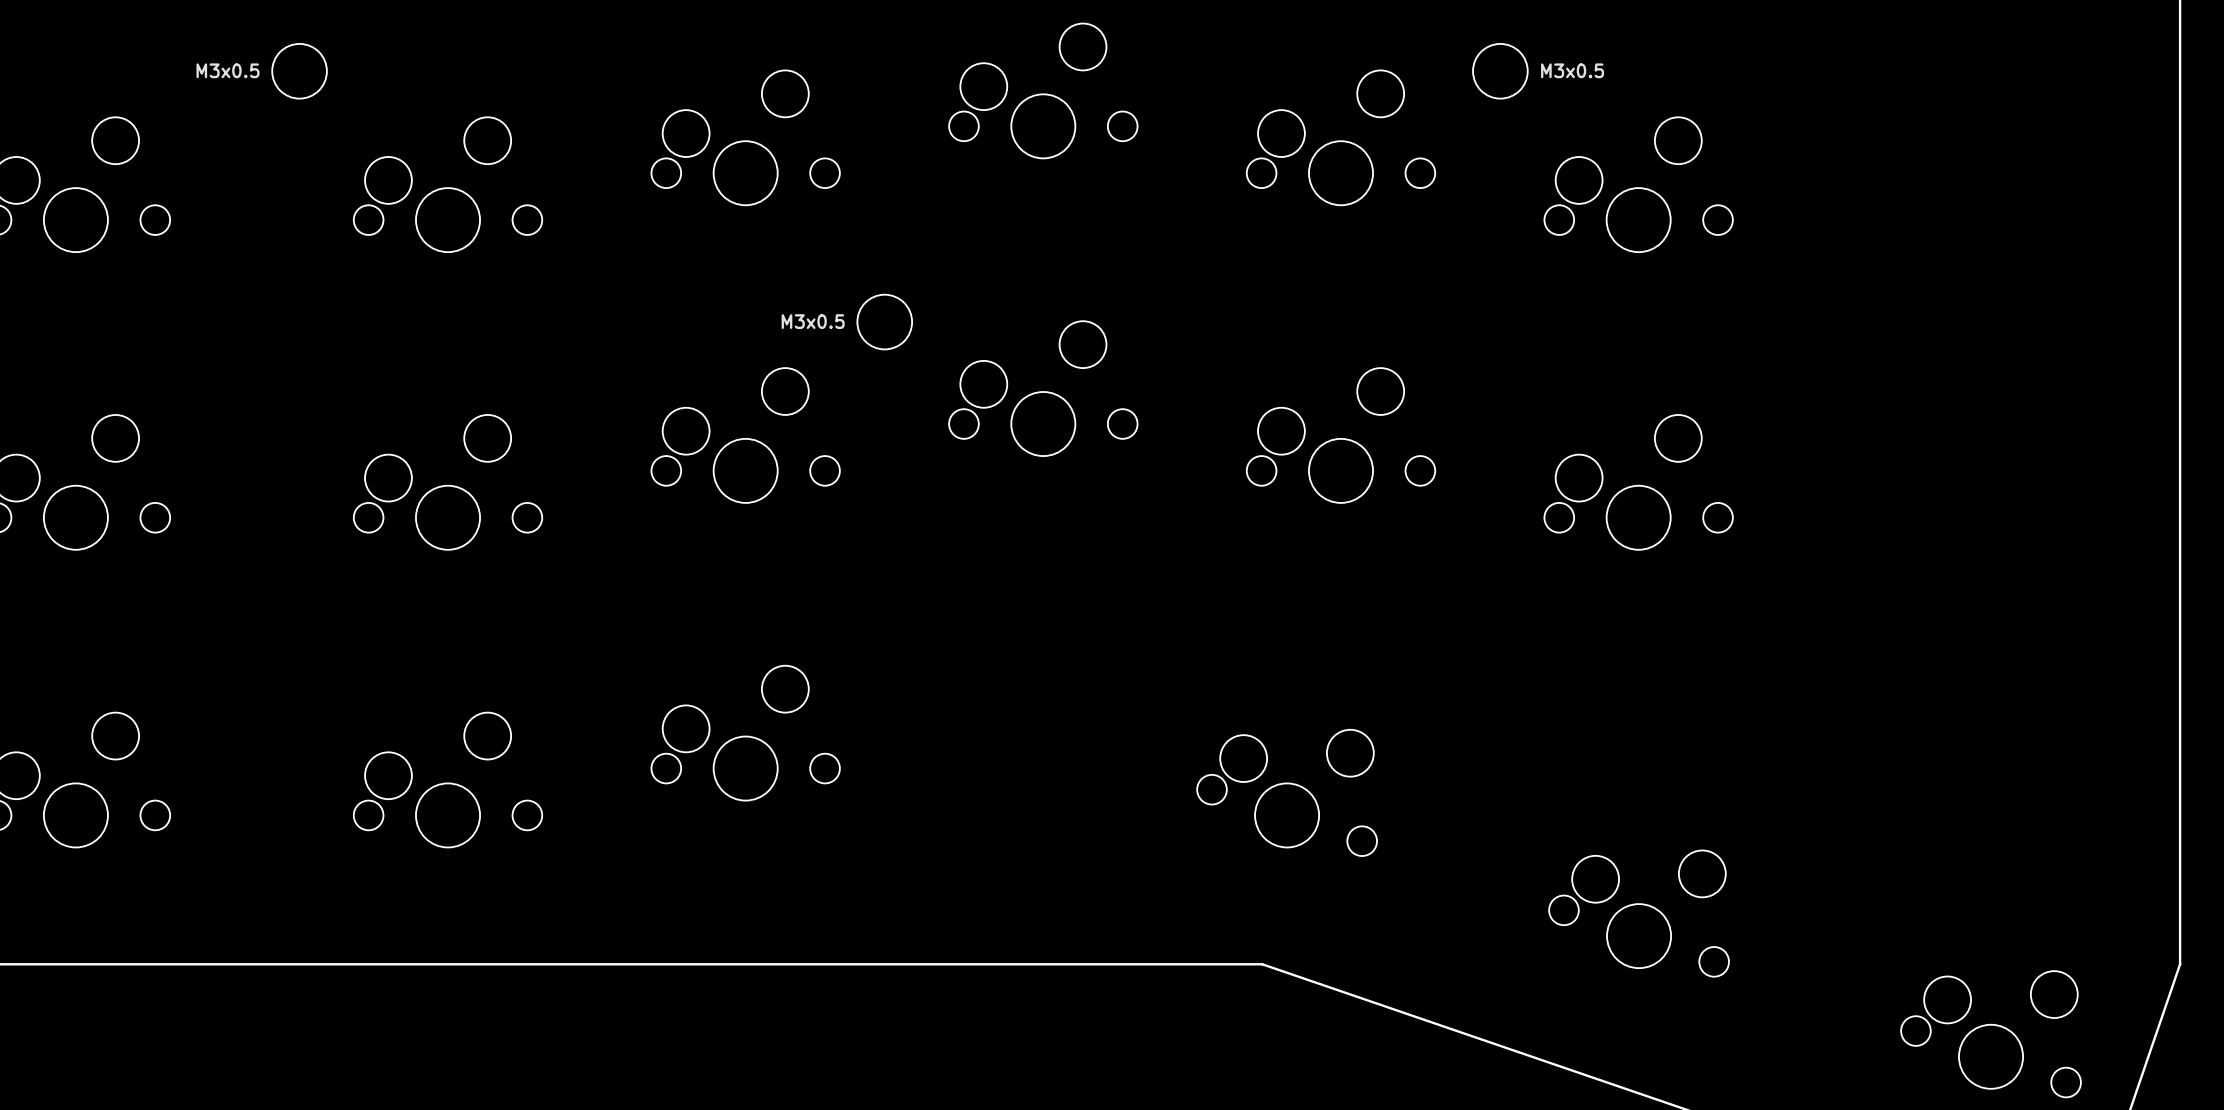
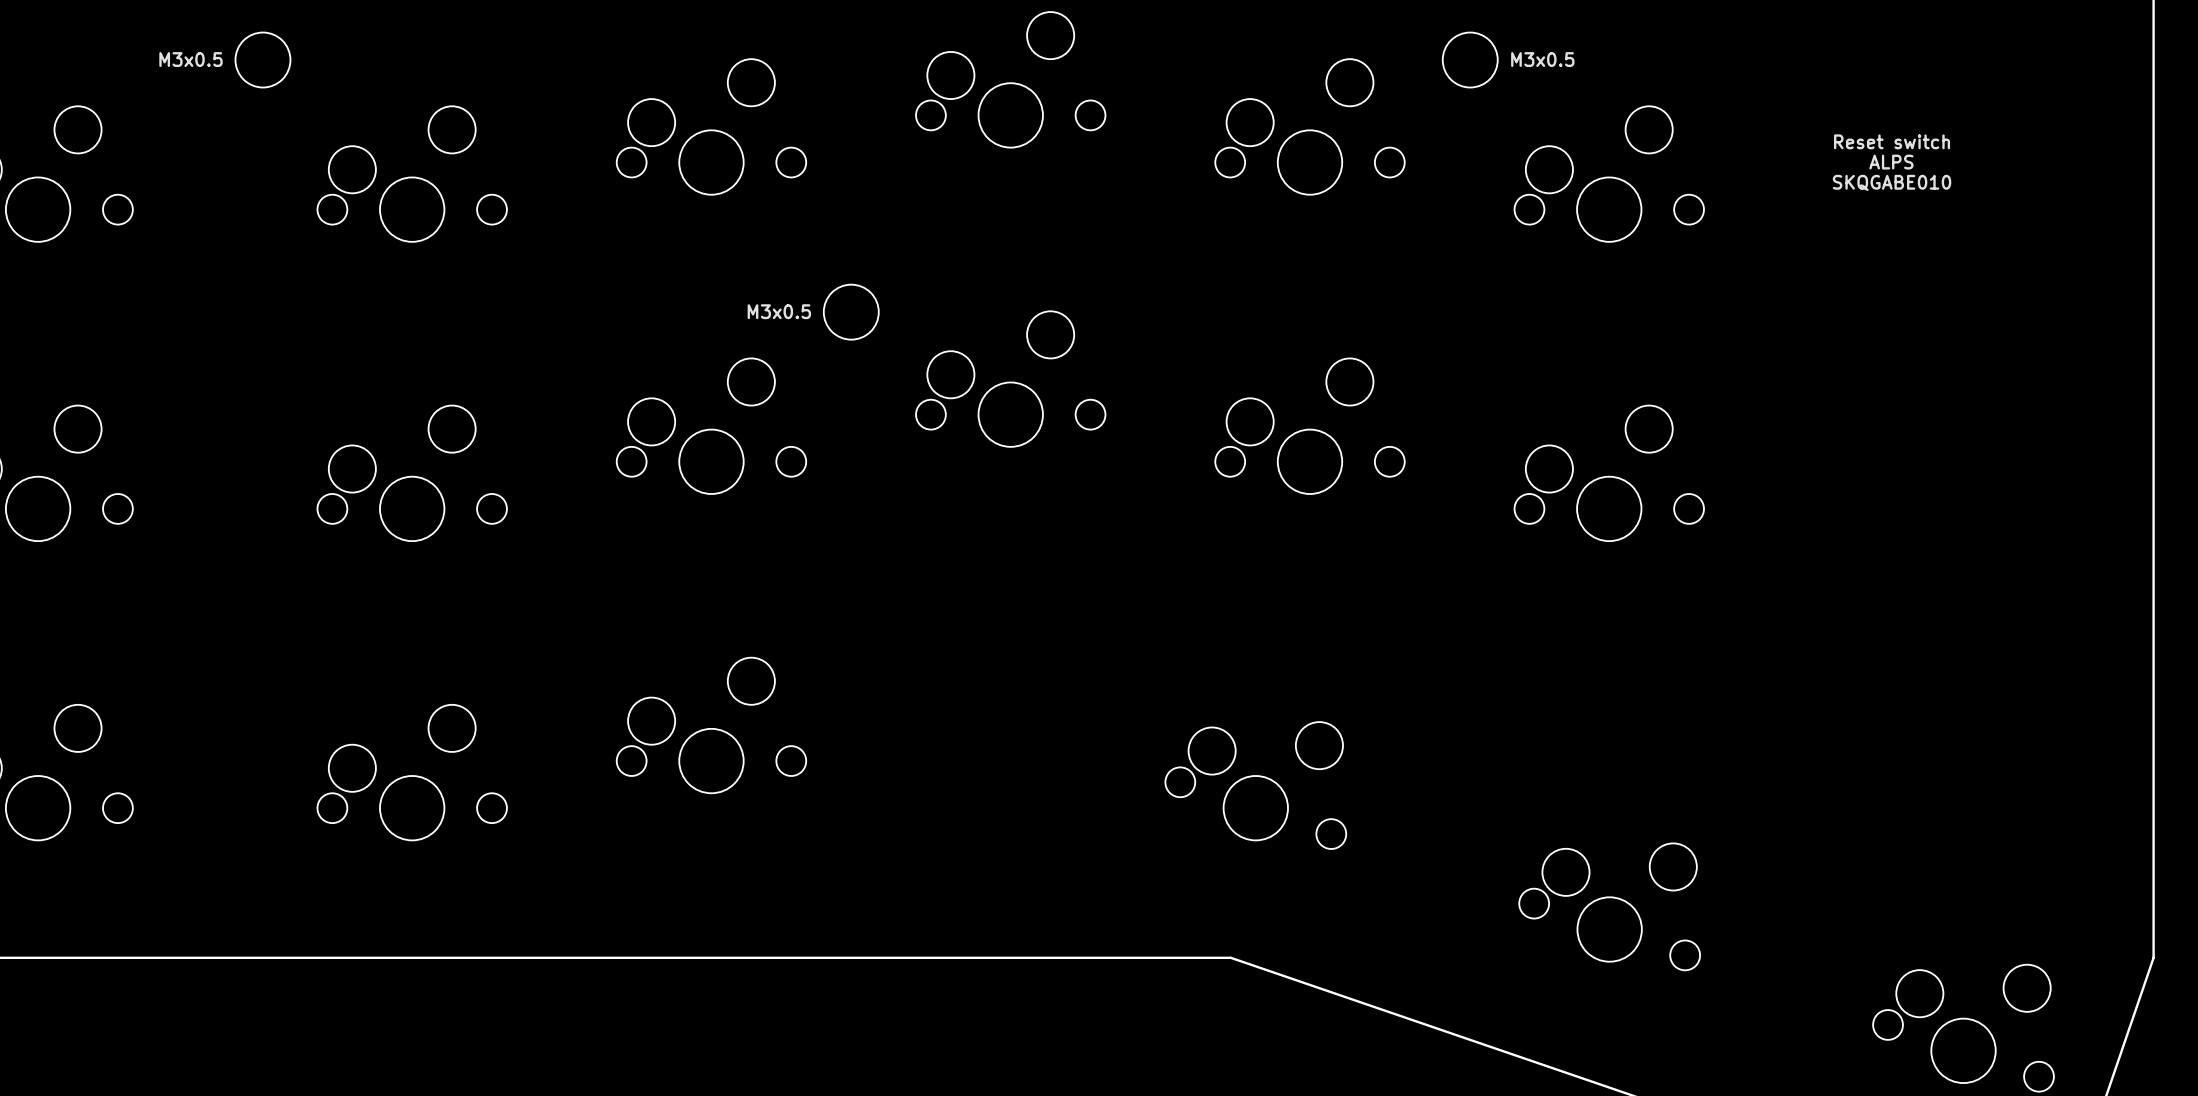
text: none -> Reset switch (1892, 141)
text: none -> ALPS (1891, 162)
text: none -> SKQGABE010 (1892, 182)

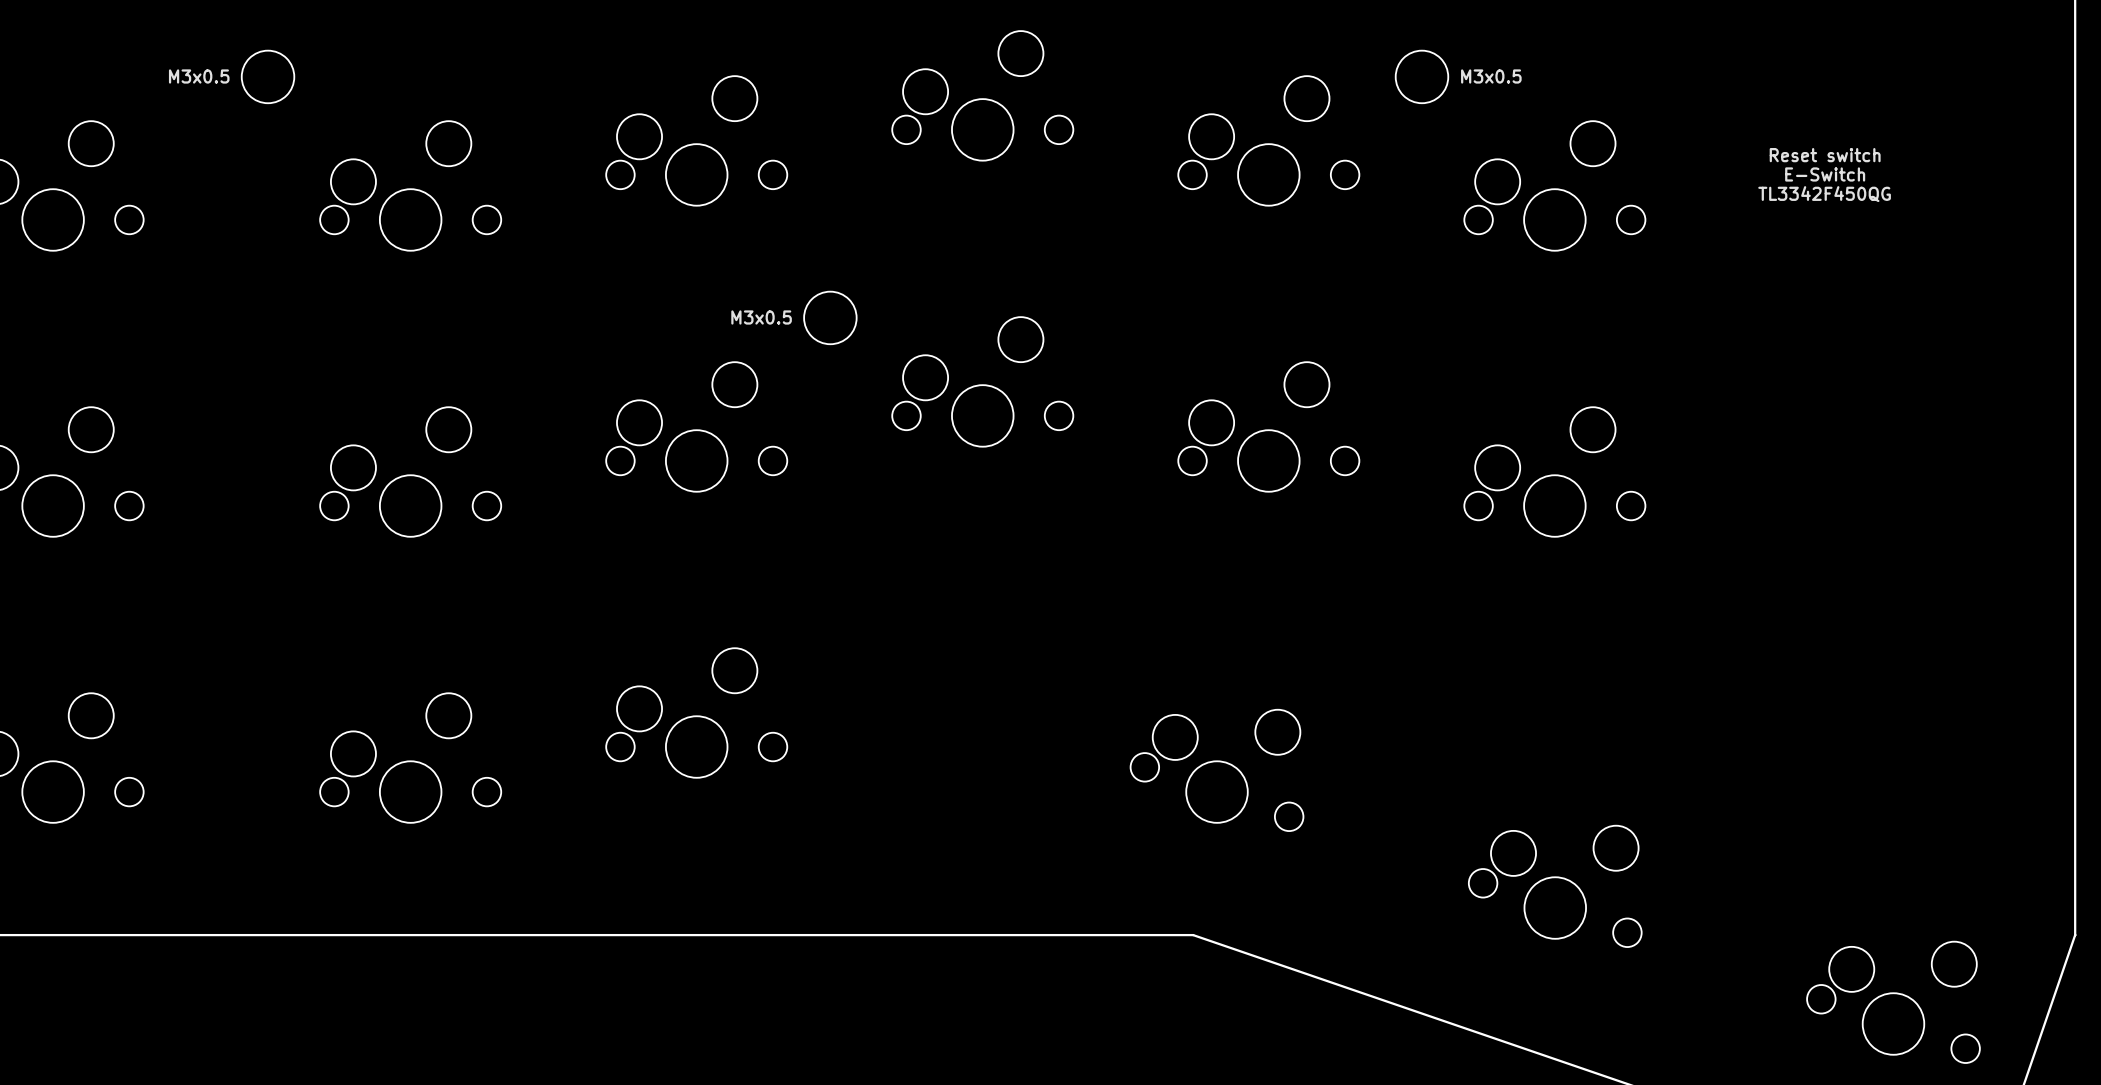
text: ALPS (1891, 162) -> E-Switch (1825, 174)
text: SKQGABE010 (1892, 182) -> TL3342F450QG (1824, 194)

